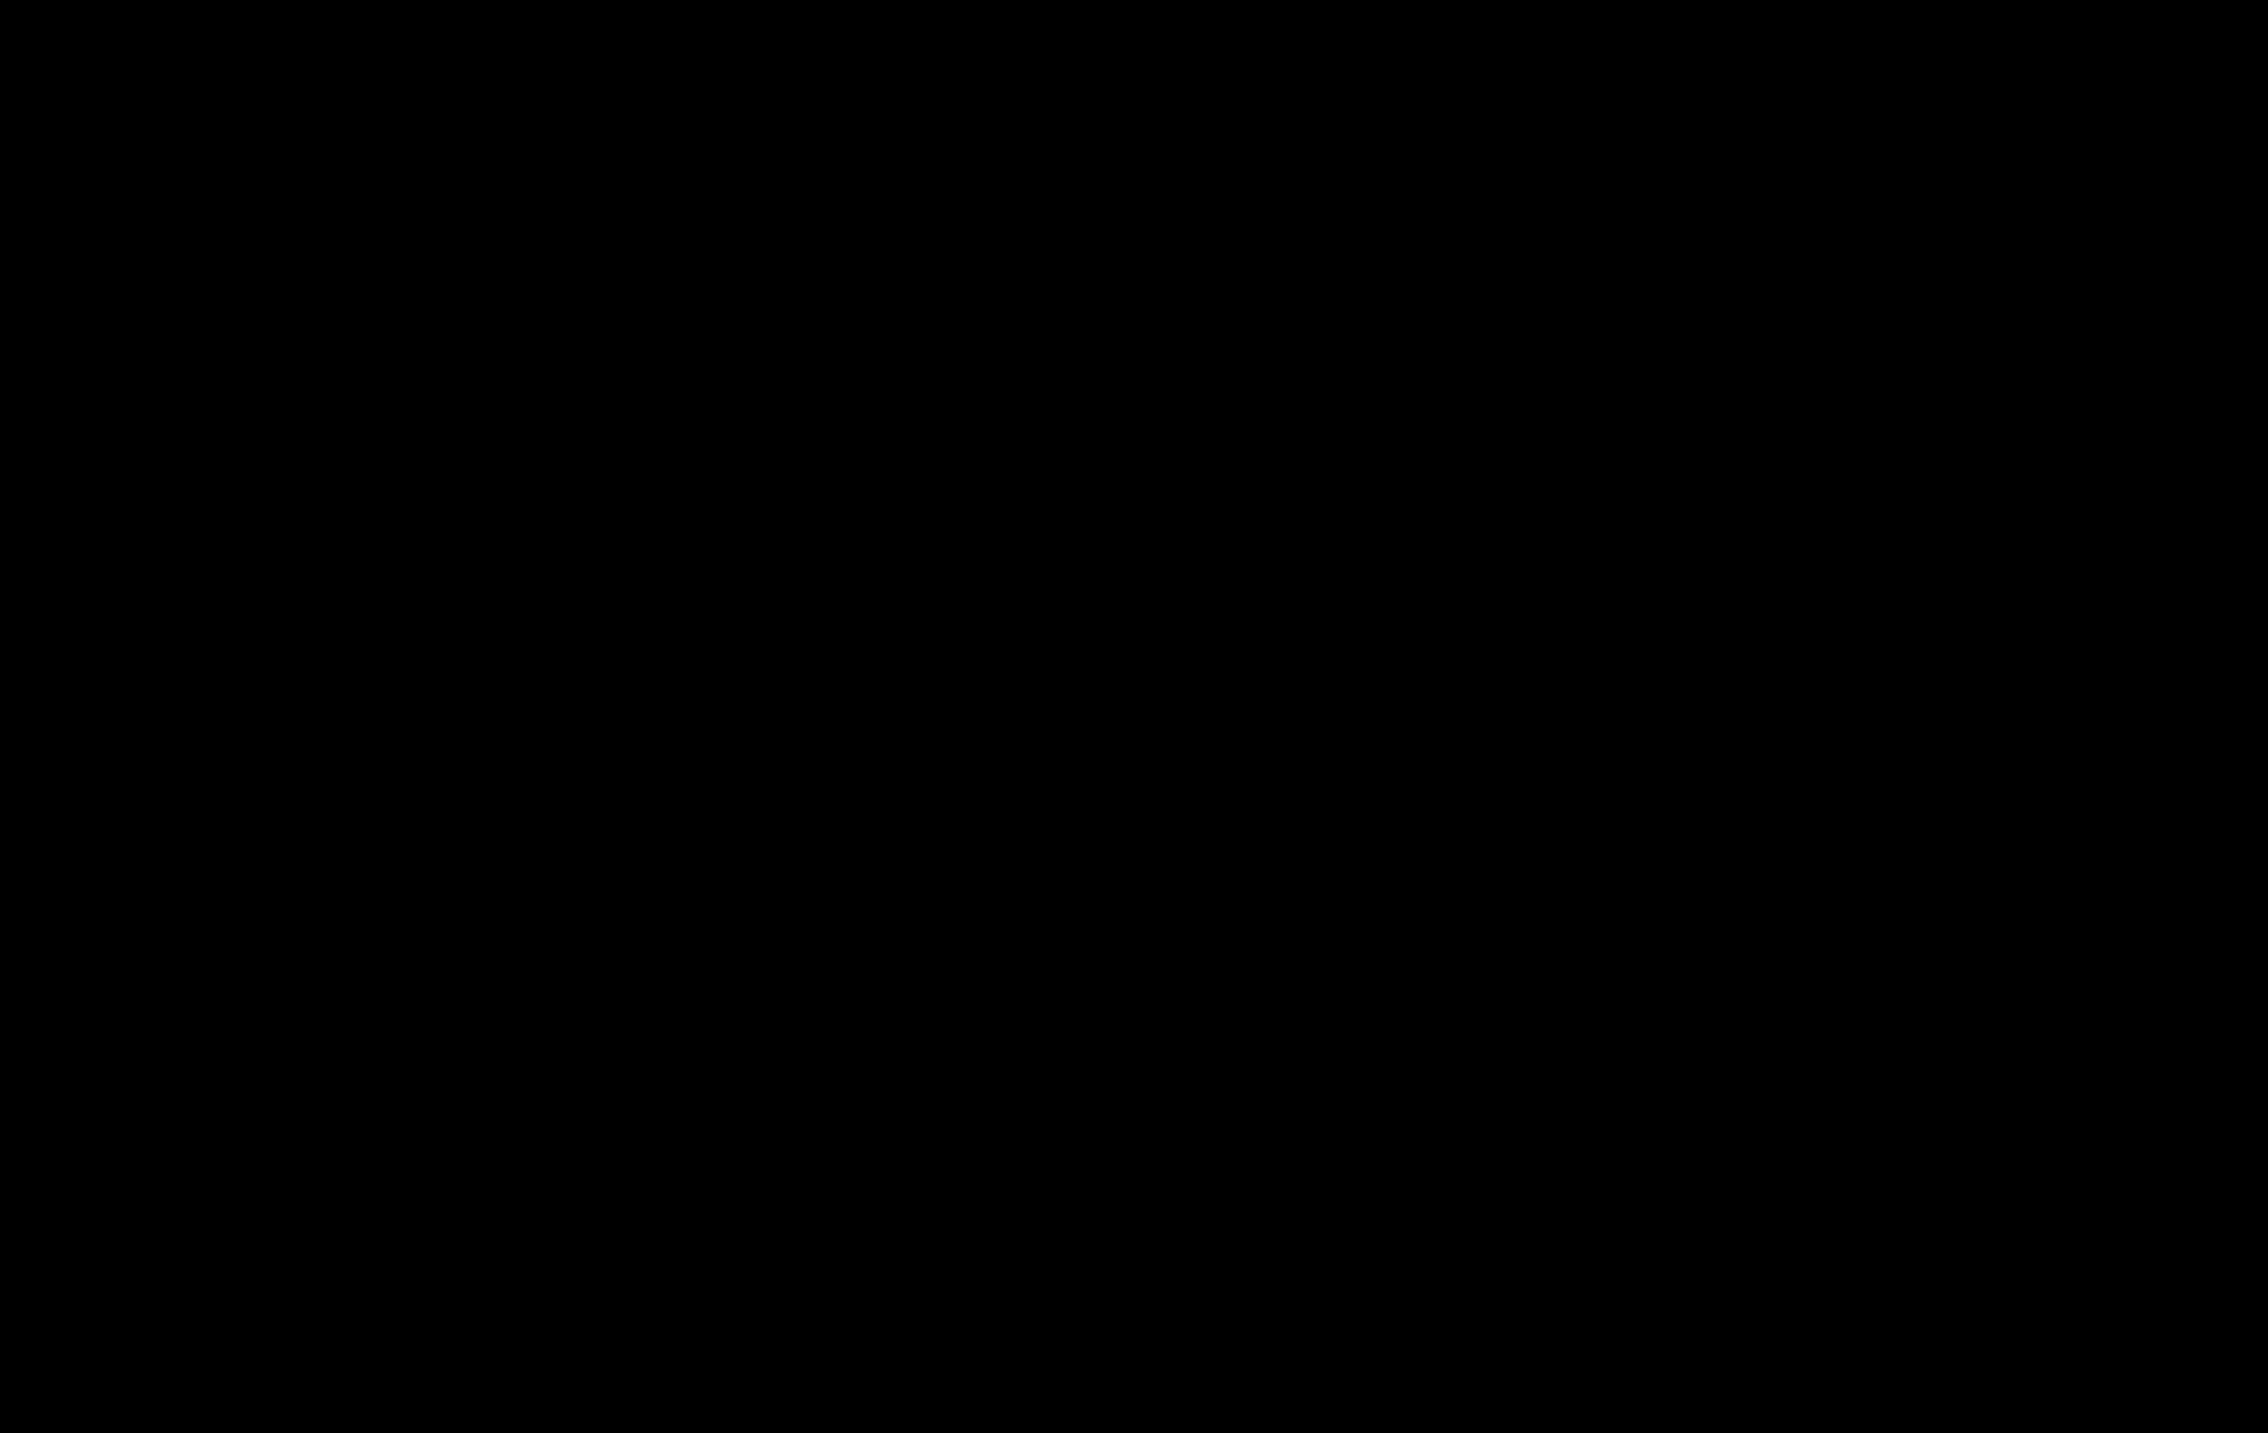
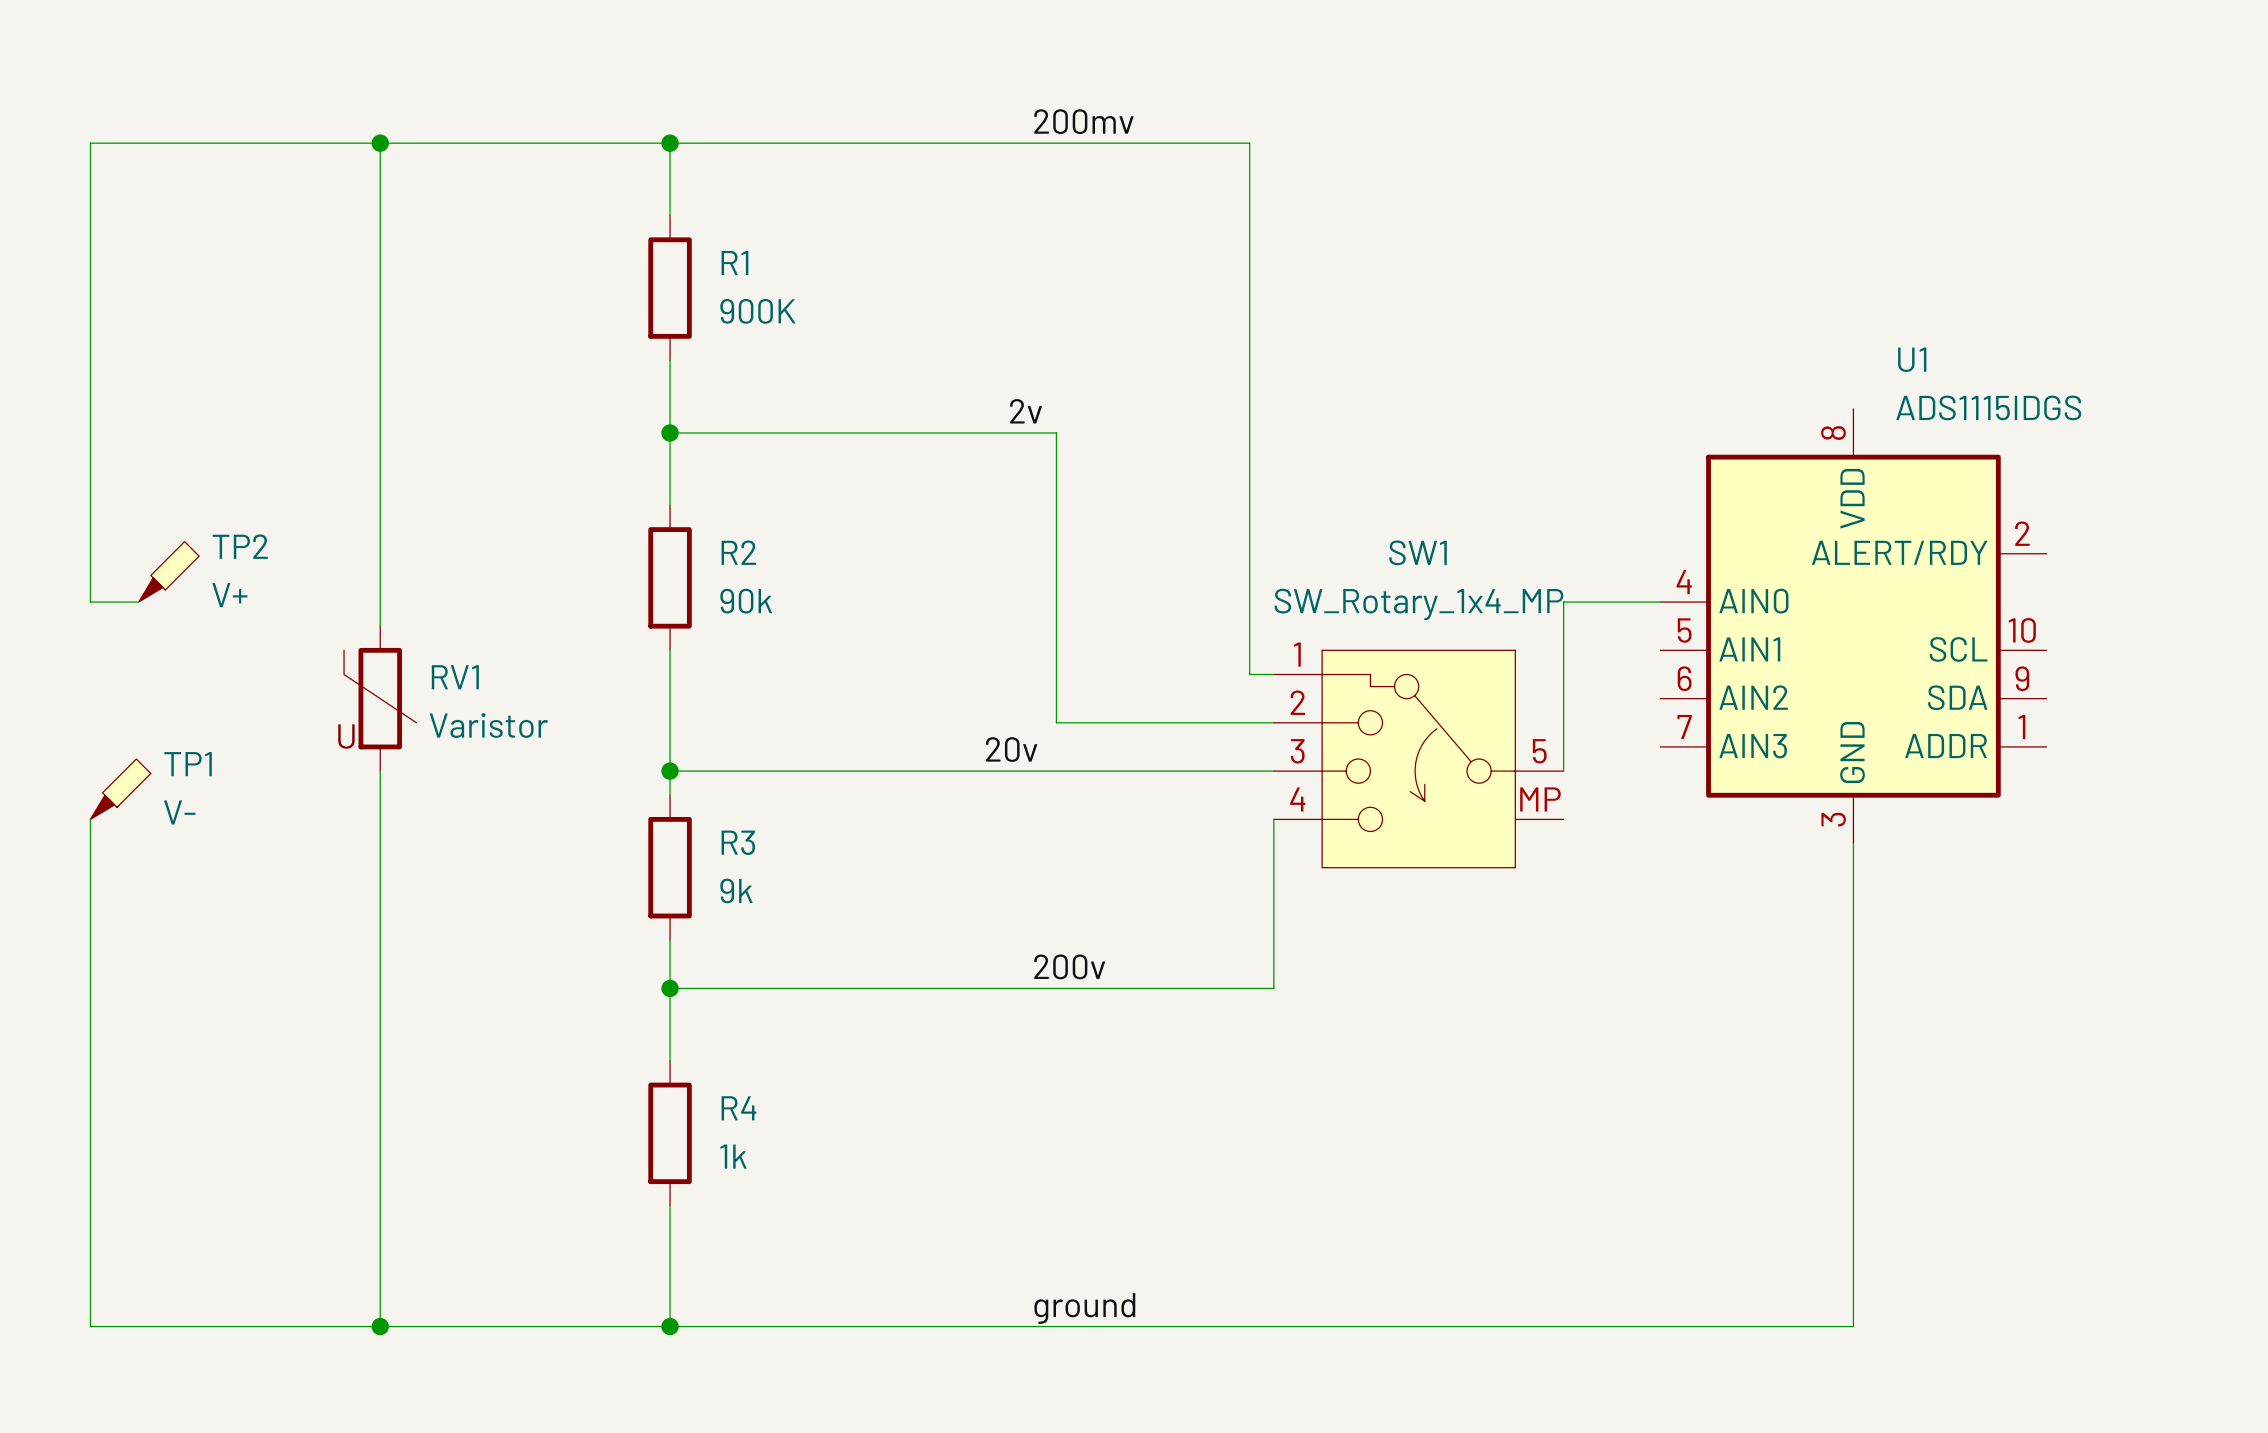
label: none -> 200mv (1083, 121)
wire: none -> (380, 143) (380, 626)
junction: none -> (380, 143)
wire: none -> (670, 143) (670, 215)
junction: none -> (670, 143)
R1: none -> 900K (670, 288)
wire: none -> (670, 360) (670, 505)
label: none -> 2v (1026, 411)
wire: none -> (670, 432) (1056, 432) (1056, 722) (1273, 722)
junction: none -> (670, 432)
TP2: none -> V+ (168, 571)
R2: none -> 90k (670, 577)
wire: none -> (138, 602) (90, 602) (90, 143) (1249, 143) (1249, 674) (1273, 674)
wire: none -> (1660, 602) (1563, 602) (1563, 771)
U1: none -> ADS1115IDGS (1853, 626)
wire: none -> (670, 650) (670, 795)
RV1: none -> Varistor (380, 698)
label: none -> 20v (1011, 749)
SW1: none -> SW_Rotary_1x4_MP (1418, 759)
wire: none -> (380, 771) (380, 1326)
wire: none -> (670, 771) (1273, 771)
junction: none -> (670, 771)
TP1: none -> V- (120, 789)
wire: none -> (90, 819) (90, 1326) (1853, 1326) (1853, 843)
wire: none -> (1273, 819) (1273, 988) (670, 988)
R3: none -> 9k (670, 867)
wire: none -> (670, 940) (670, 1060)
label: none -> 200v (1069, 966)
junction: none -> (670, 988)
R4: none -> 1k (670, 1133)
wire: none -> (670, 1205) (670, 1326)
label: none -> ground (1084, 1308)
junction: none -> (380, 1326)
junction: none -> (670, 1326)

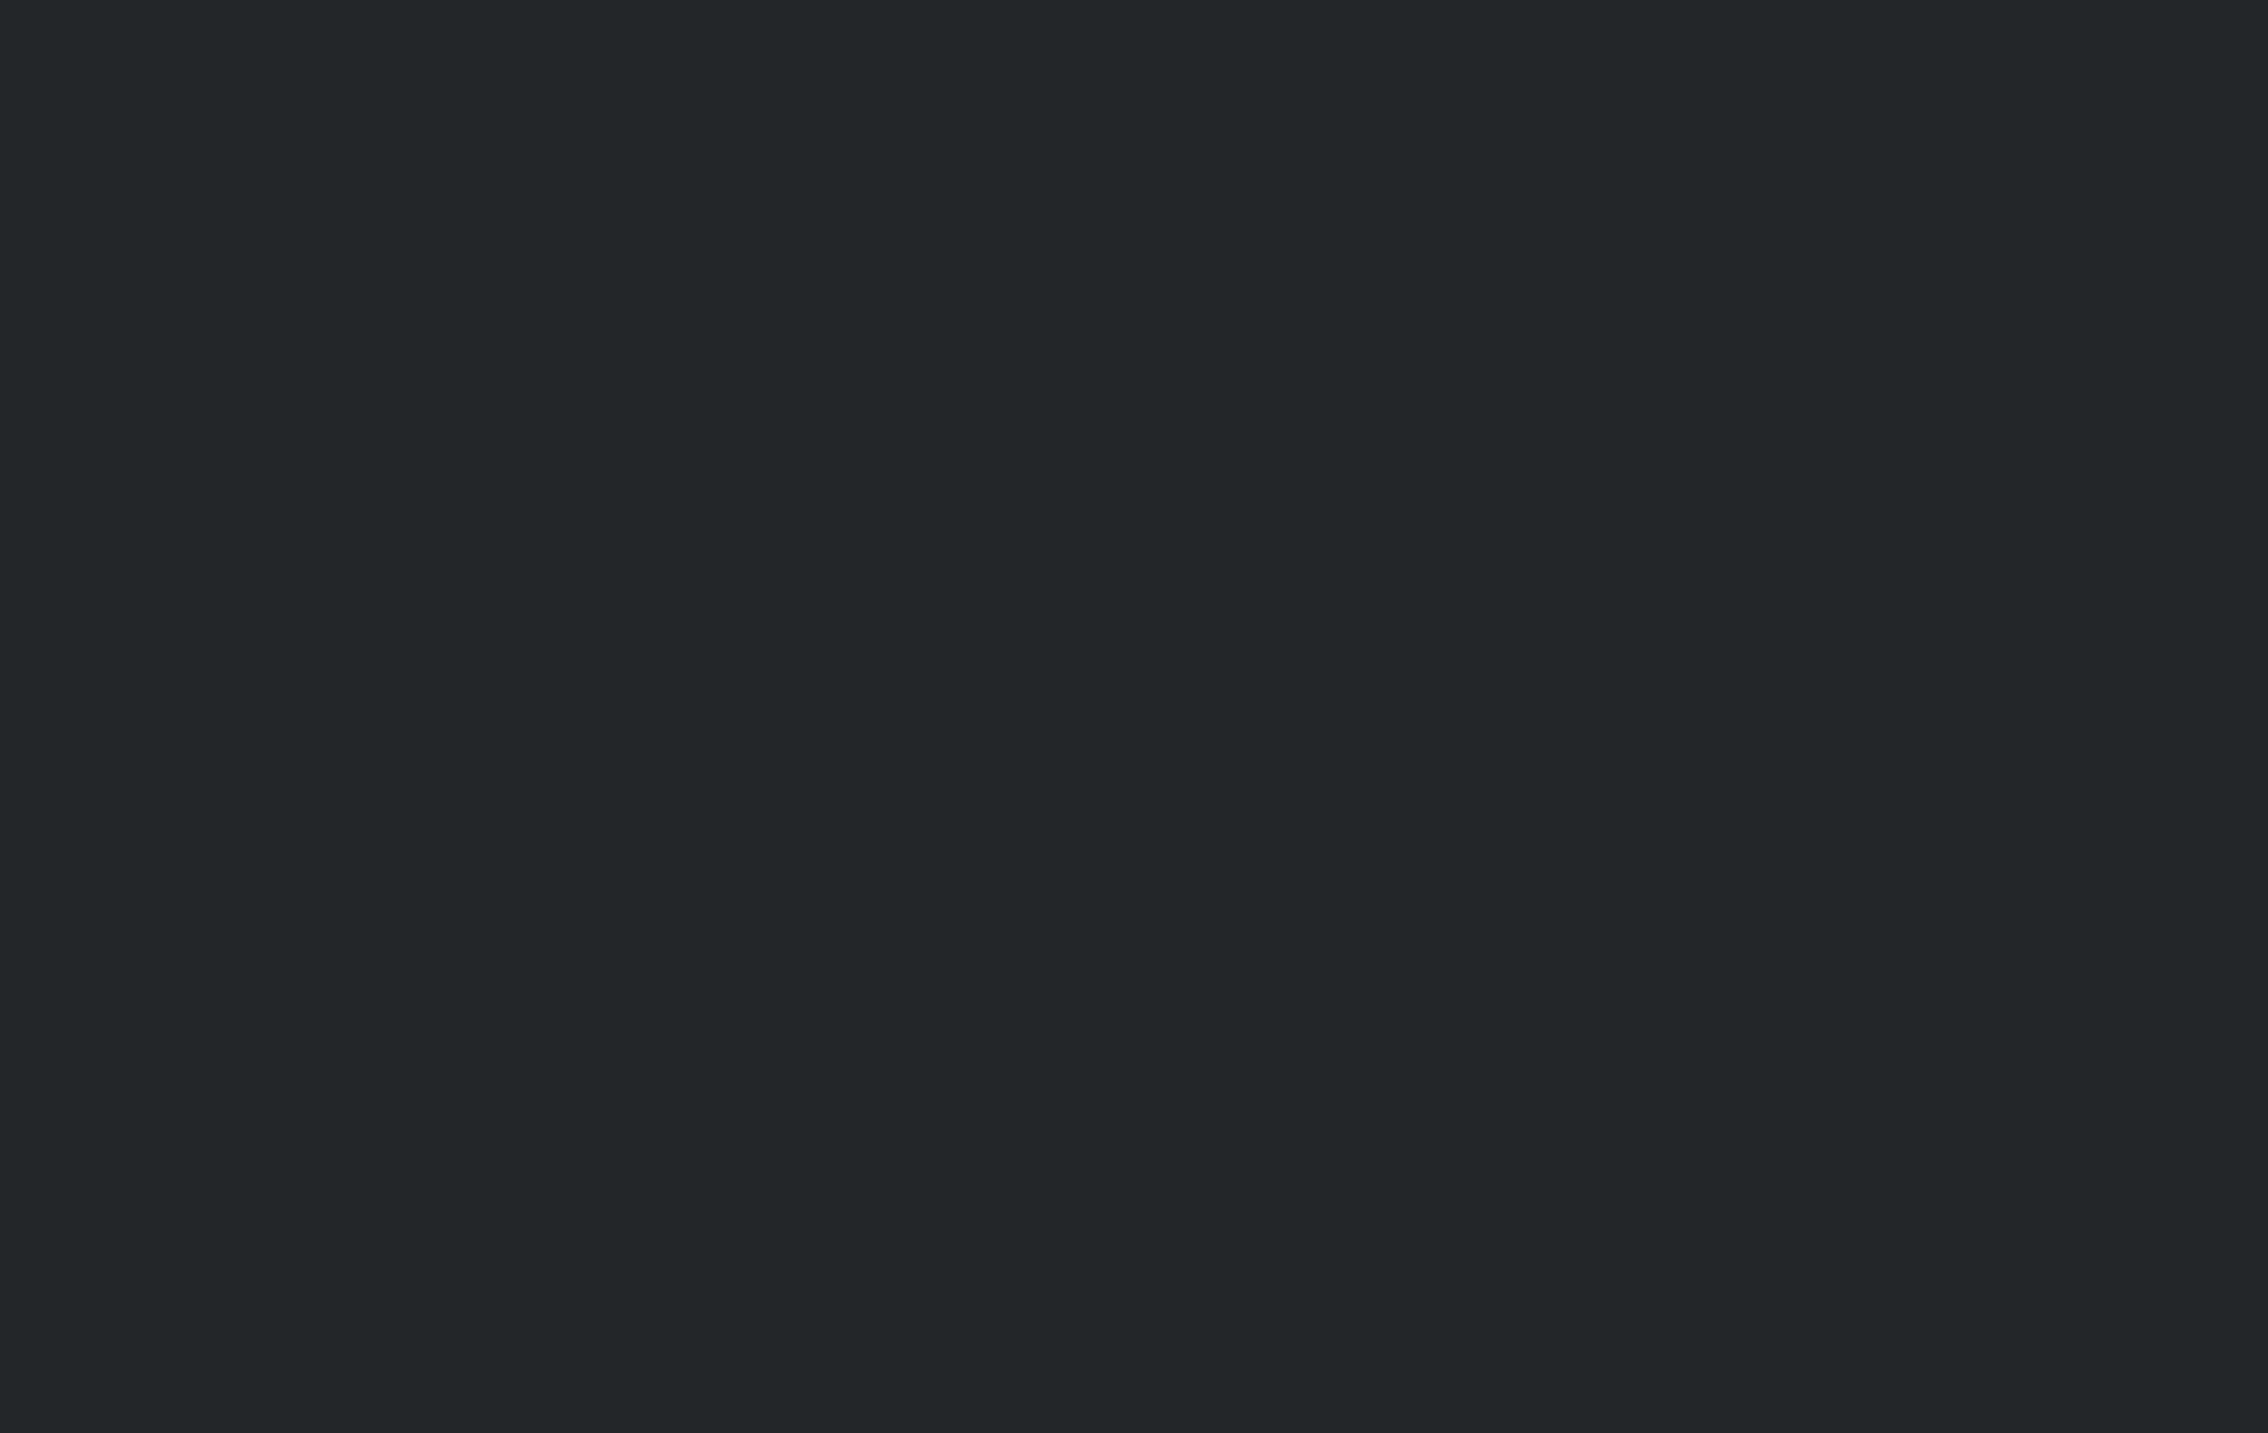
label: 200mv (1083, 121) -> none
wire: (380, 143) (380, 626) -> none
junction: (380, 143) -> none
wire: (670, 143) (670, 215) -> none
junction: (670, 143) -> none
R1: 900K (670, 288) -> none
wire: (670, 360) (670, 505) -> none
label: 2v (1026, 411) -> none
wire: (670, 432) (1056, 432) (1056, 722) (1273, 722) -> none
junction: (670, 432) -> none
TP2: V+ (168, 571) -> none
R2: 90k (670, 577) -> none
wire: (138, 602) (90, 602) (90, 143) (1249, 143) (1249, 674) (1273, 674) -> none
wire: (1660, 602) (1563, 602) (1563, 771) -> none
U1: ADS1115IDGS (1853, 626) -> none
wire: (670, 650) (670, 795) -> none
RV1: Varistor (380, 698) -> none
label: 20v (1011, 749) -> none
SW1: SW_Rotary_1x4_MP (1418, 759) -> none
wire: (380, 771) (380, 1326) -> none
wire: (670, 771) (1273, 771) -> none
junction: (670, 771) -> none
TP1: V- (120, 789) -> none
wire: (90, 819) (90, 1326) (1853, 1326) (1853, 843) -> none
wire: (1273, 819) (1273, 988) (670, 988) -> none
R3: 9k (670, 867) -> none
wire: (670, 940) (670, 1060) -> none
label: 200v (1069, 966) -> none
junction: (670, 988) -> none
R4: 1k (670, 1133) -> none
wire: (670, 1205) (670, 1326) -> none
label: ground (1084, 1308) -> none
junction: (380, 1326) -> none
junction: (670, 1326) -> none

